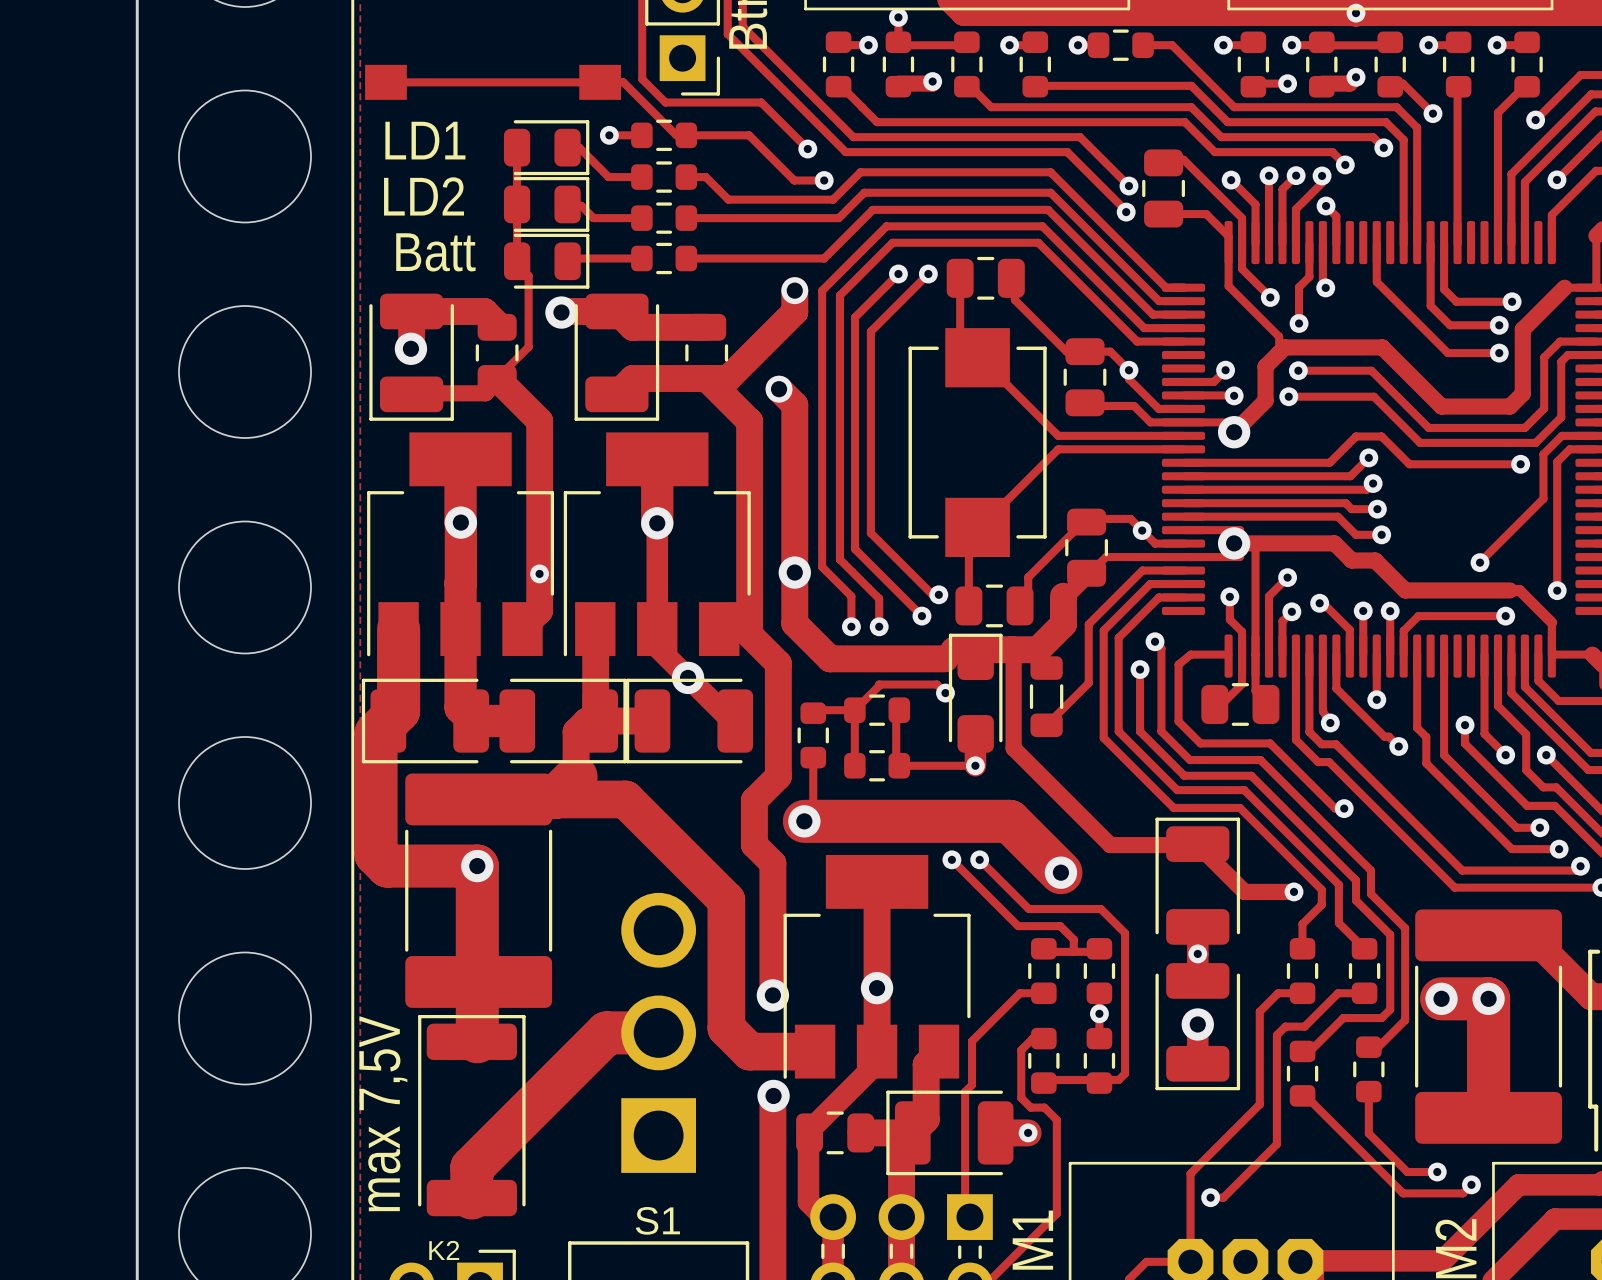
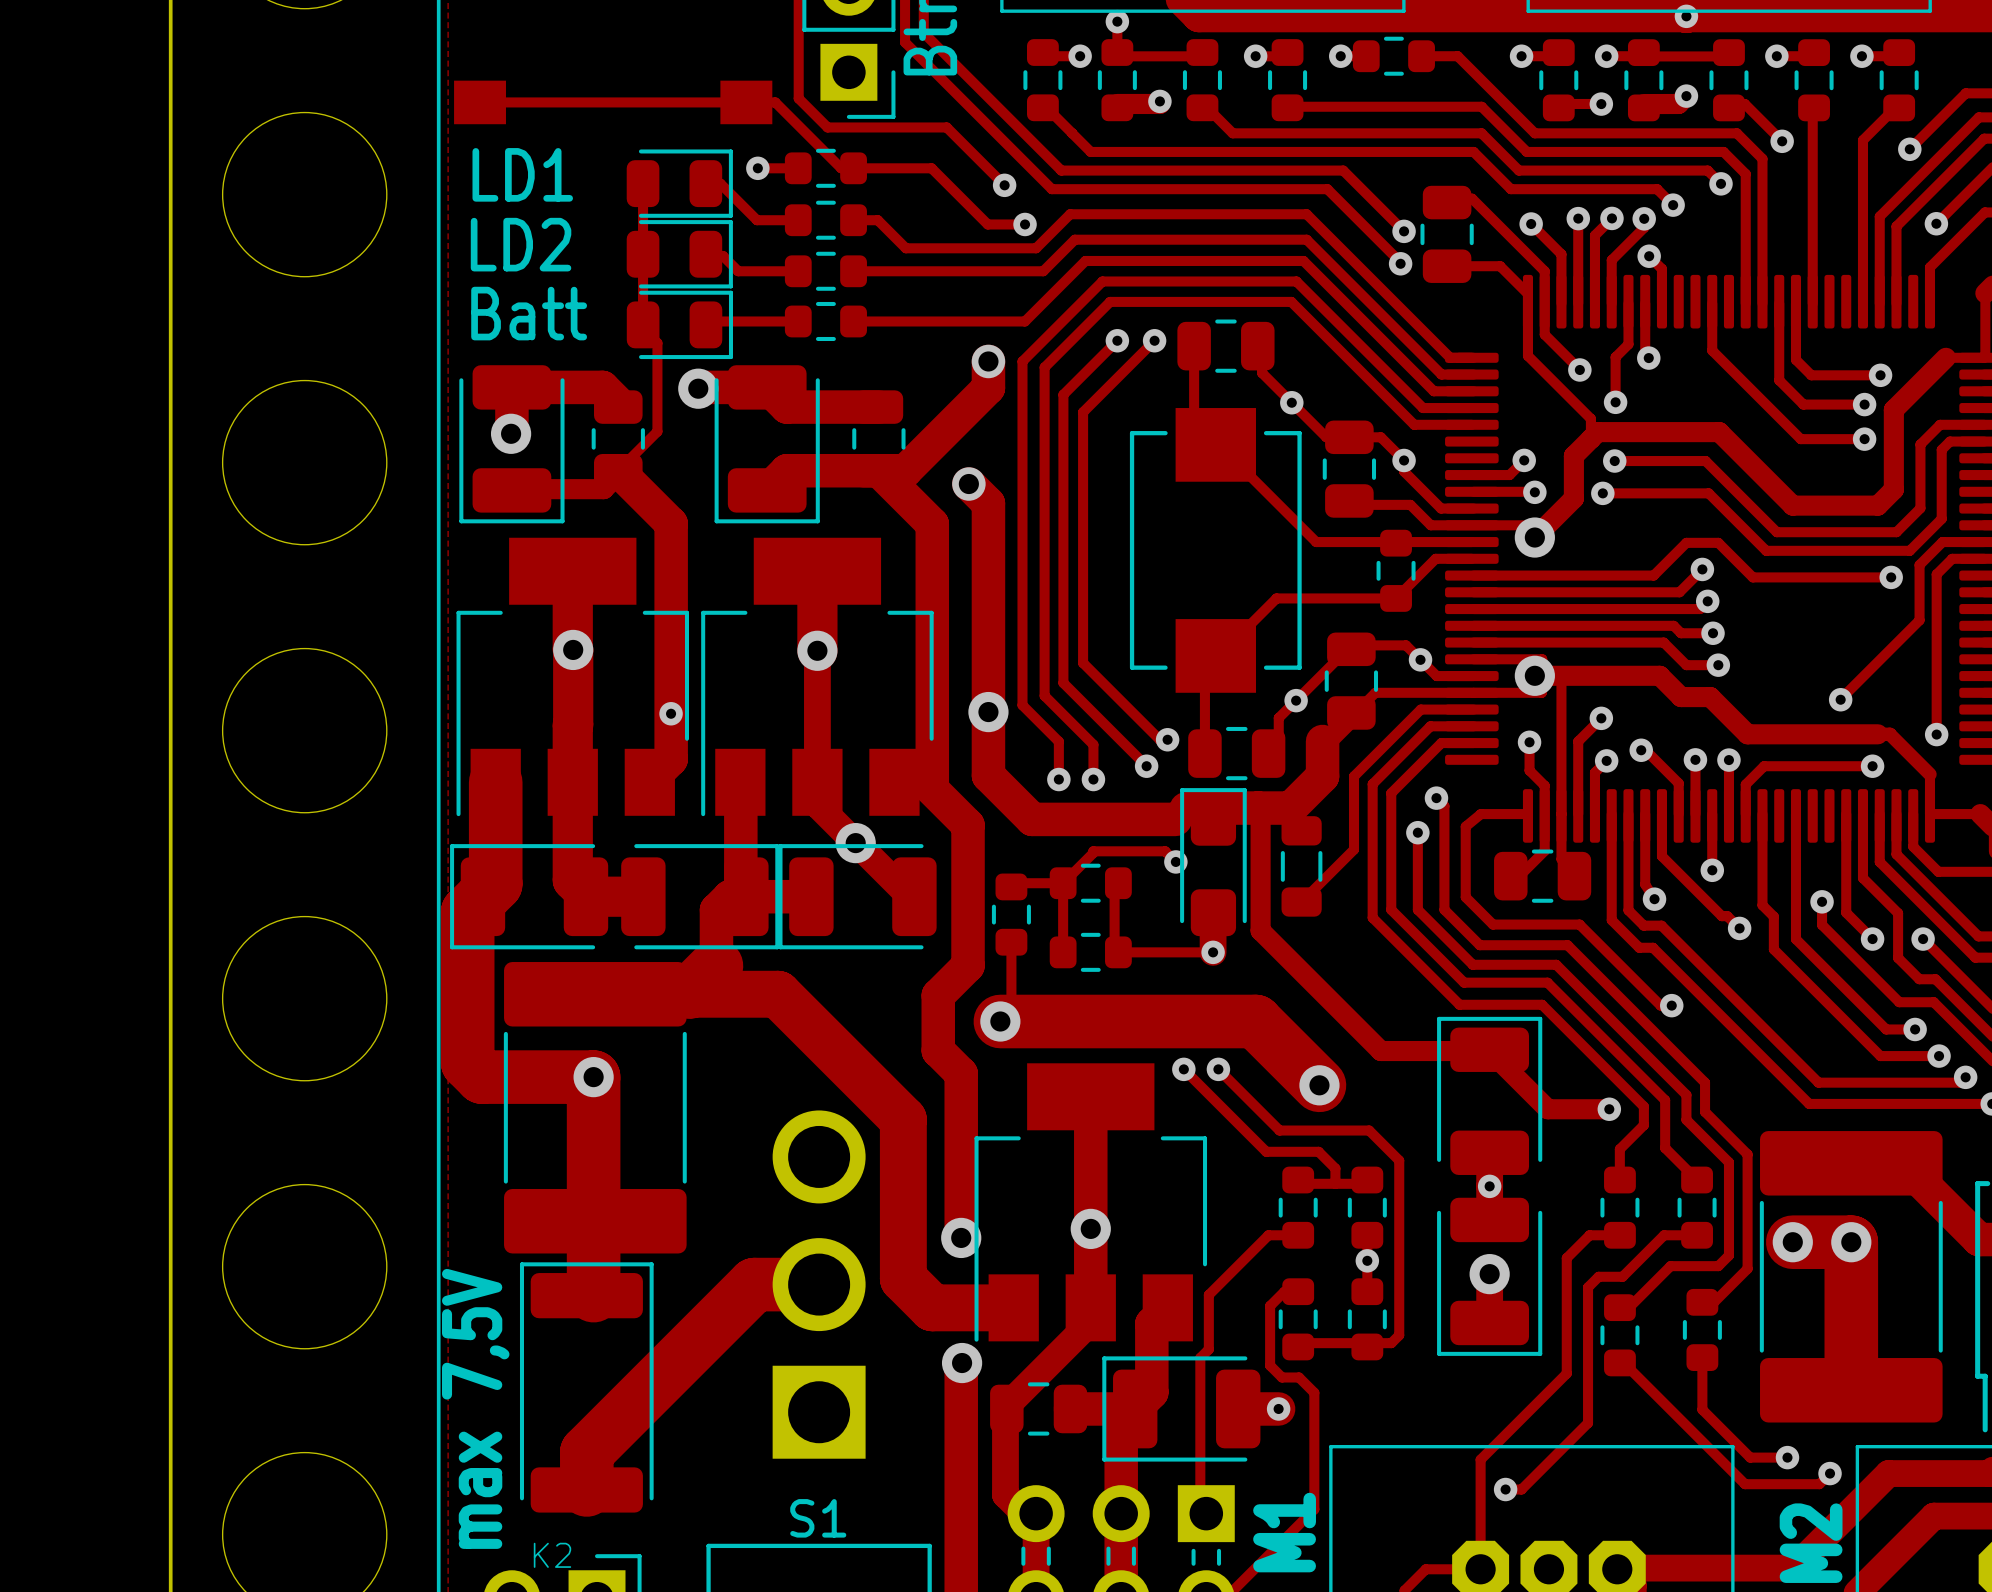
via: none -> (1291, 402)
track: (1154, 449) (1058, 449) (1026, 481) -> (1435, 558) (1396, 598) (1276, 598)
part: none -> (1396, 570)
via: none -> (1296, 700)

